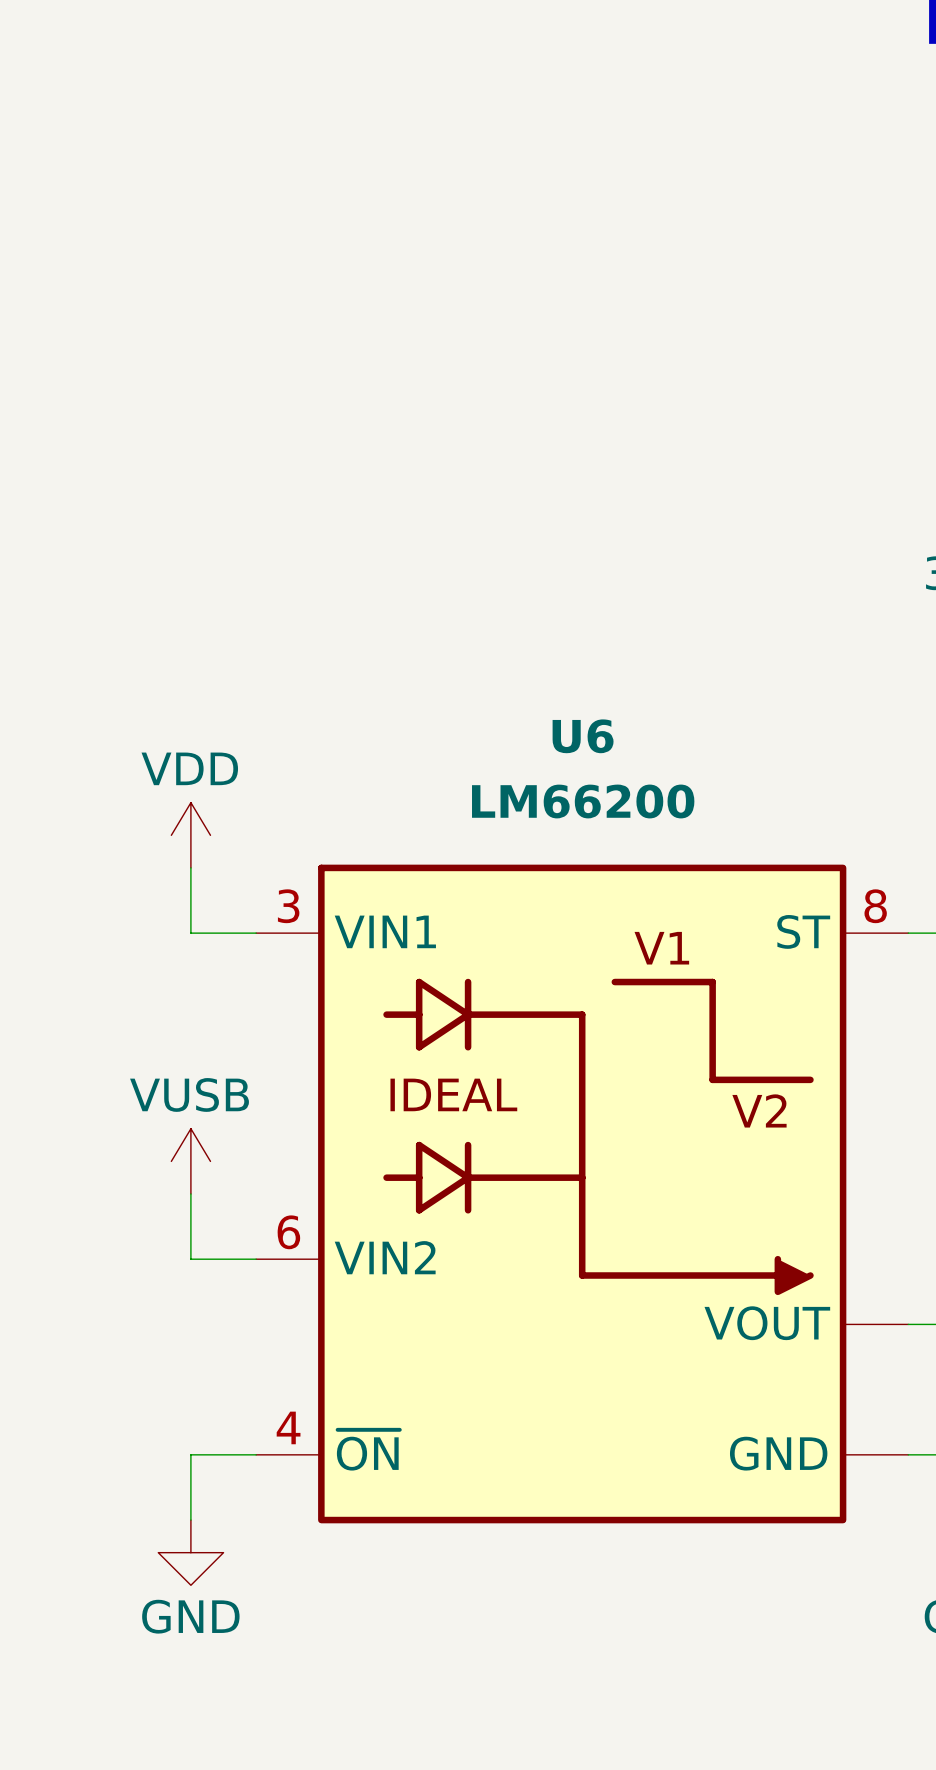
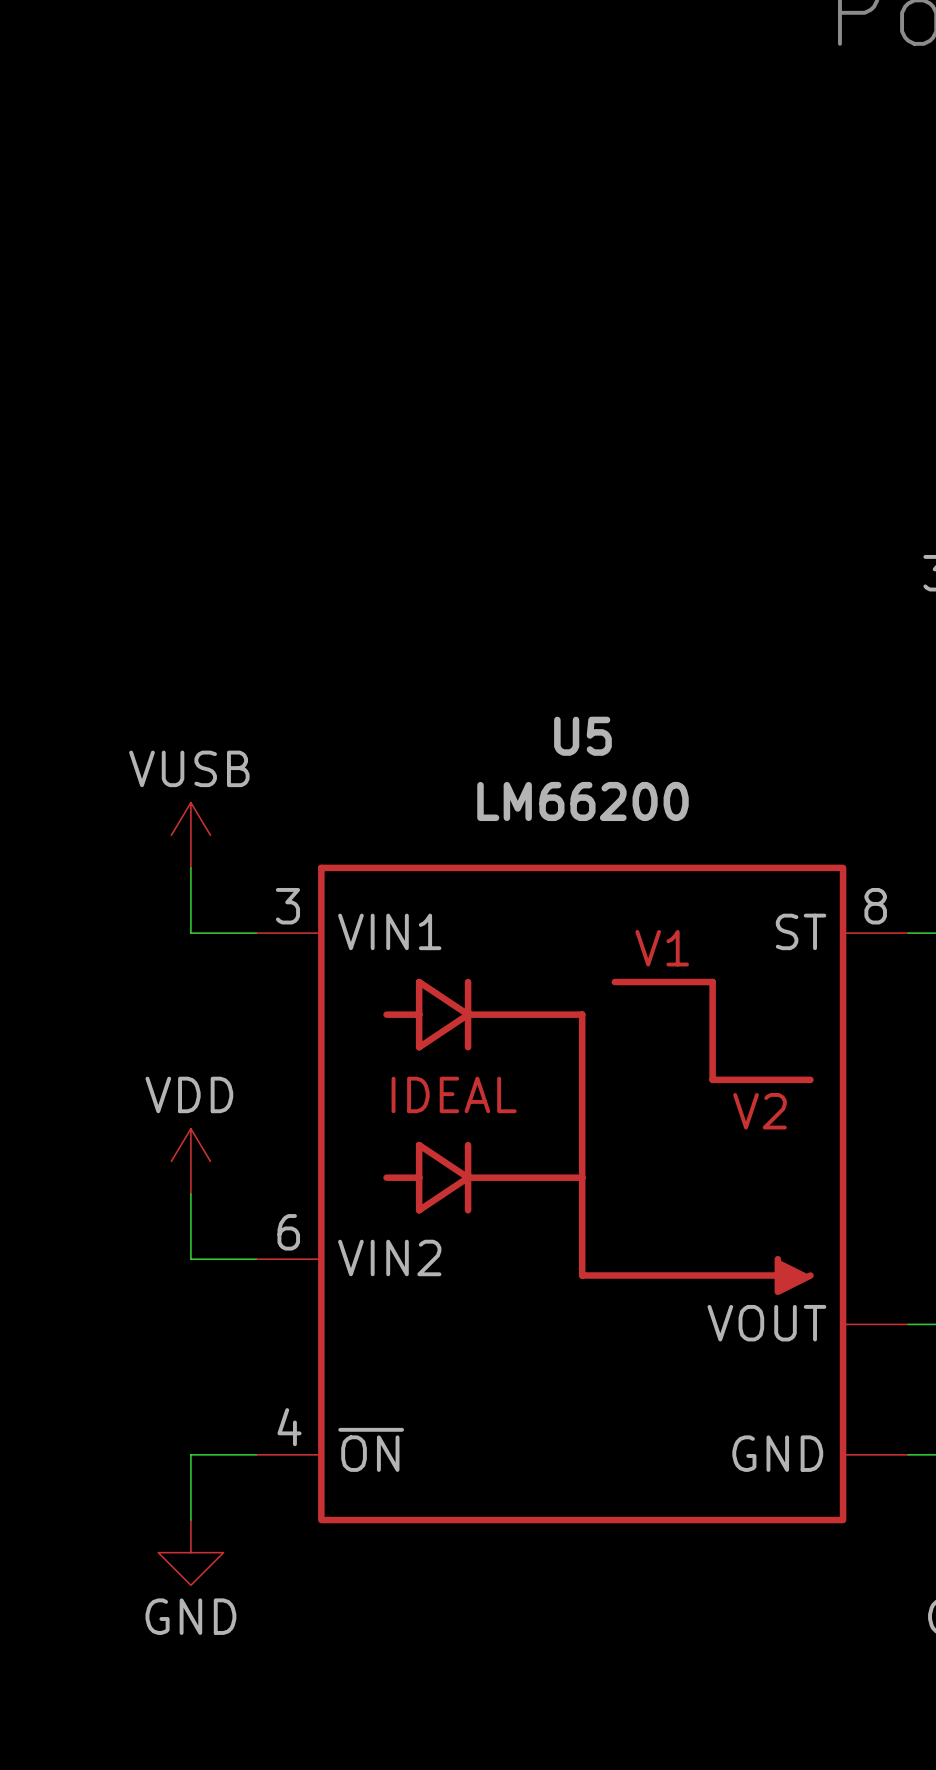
U6 name: U6 (583, 736) -> U5 (582, 736)
power symbol: VDD (190, 835) -> VUSB (190, 835)
power symbol: VUSB (190, 1161) -> VDD (190, 1161)

